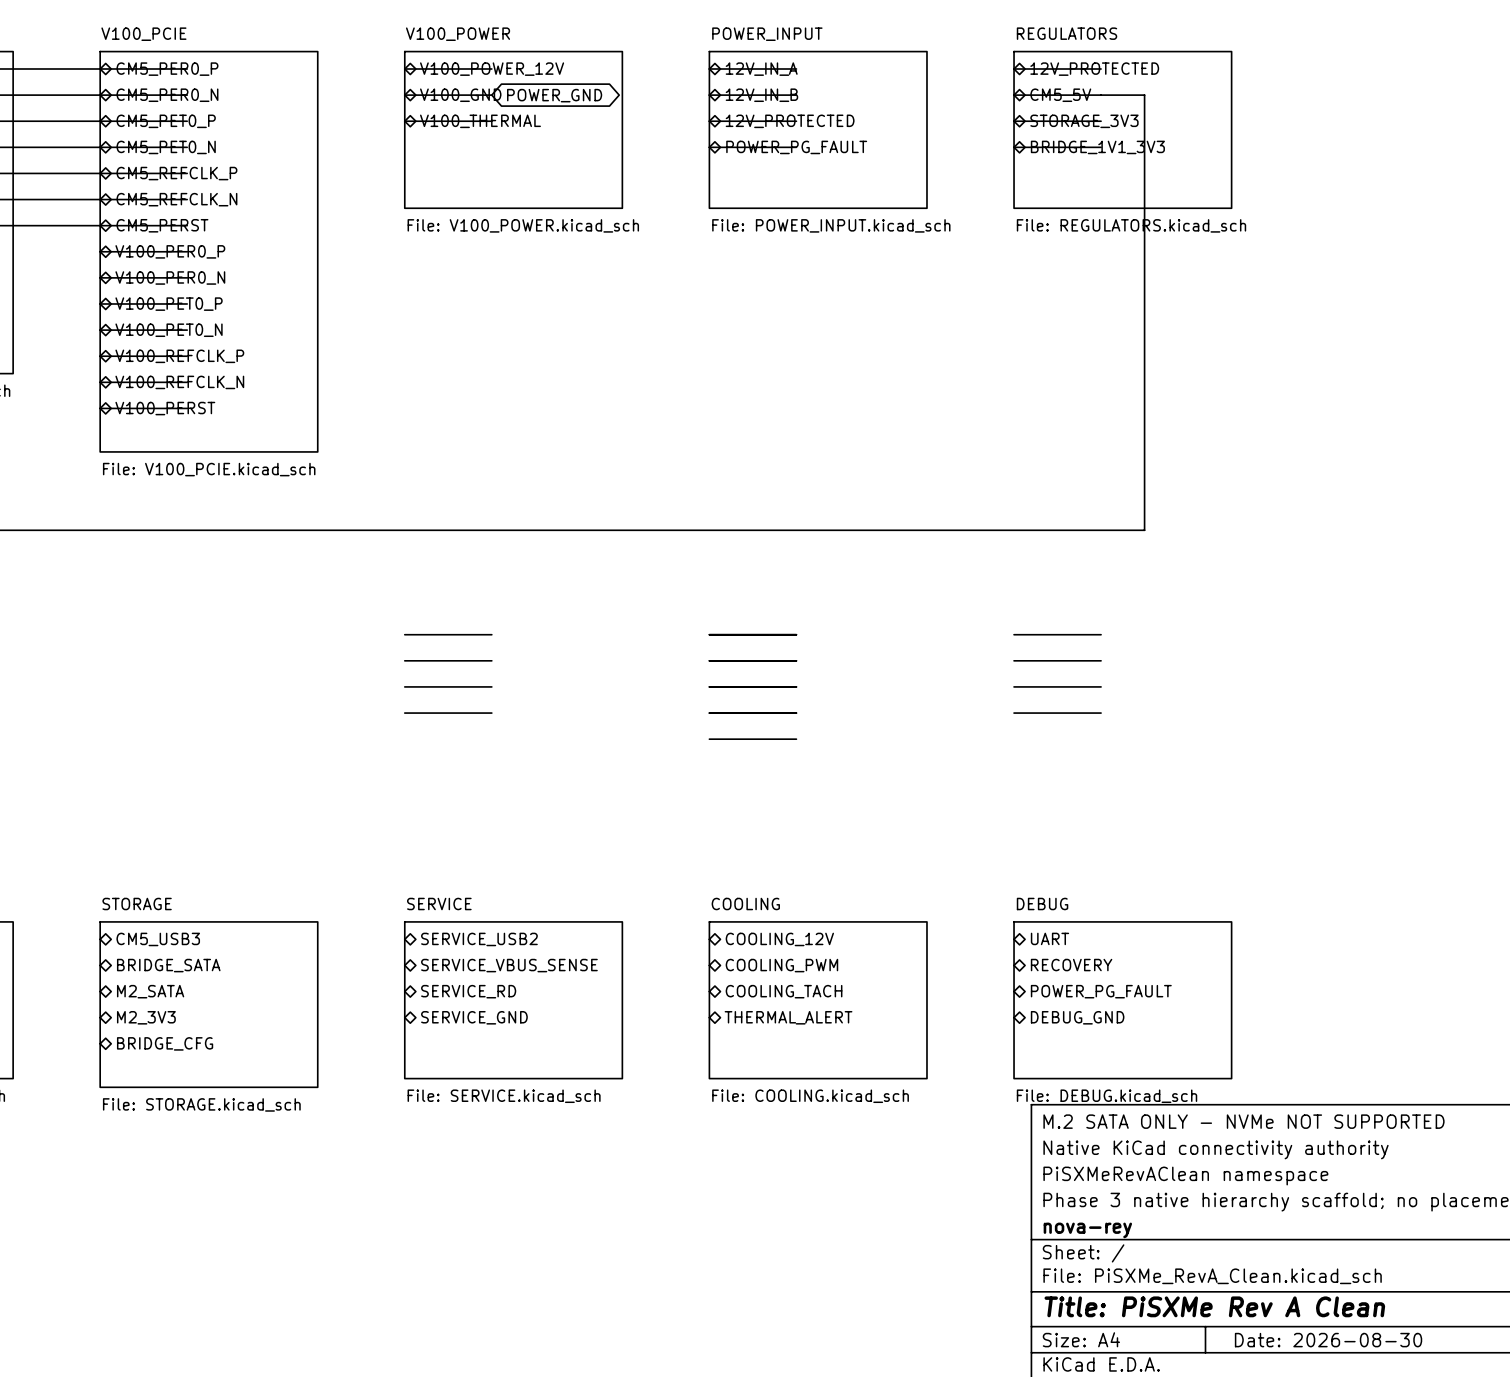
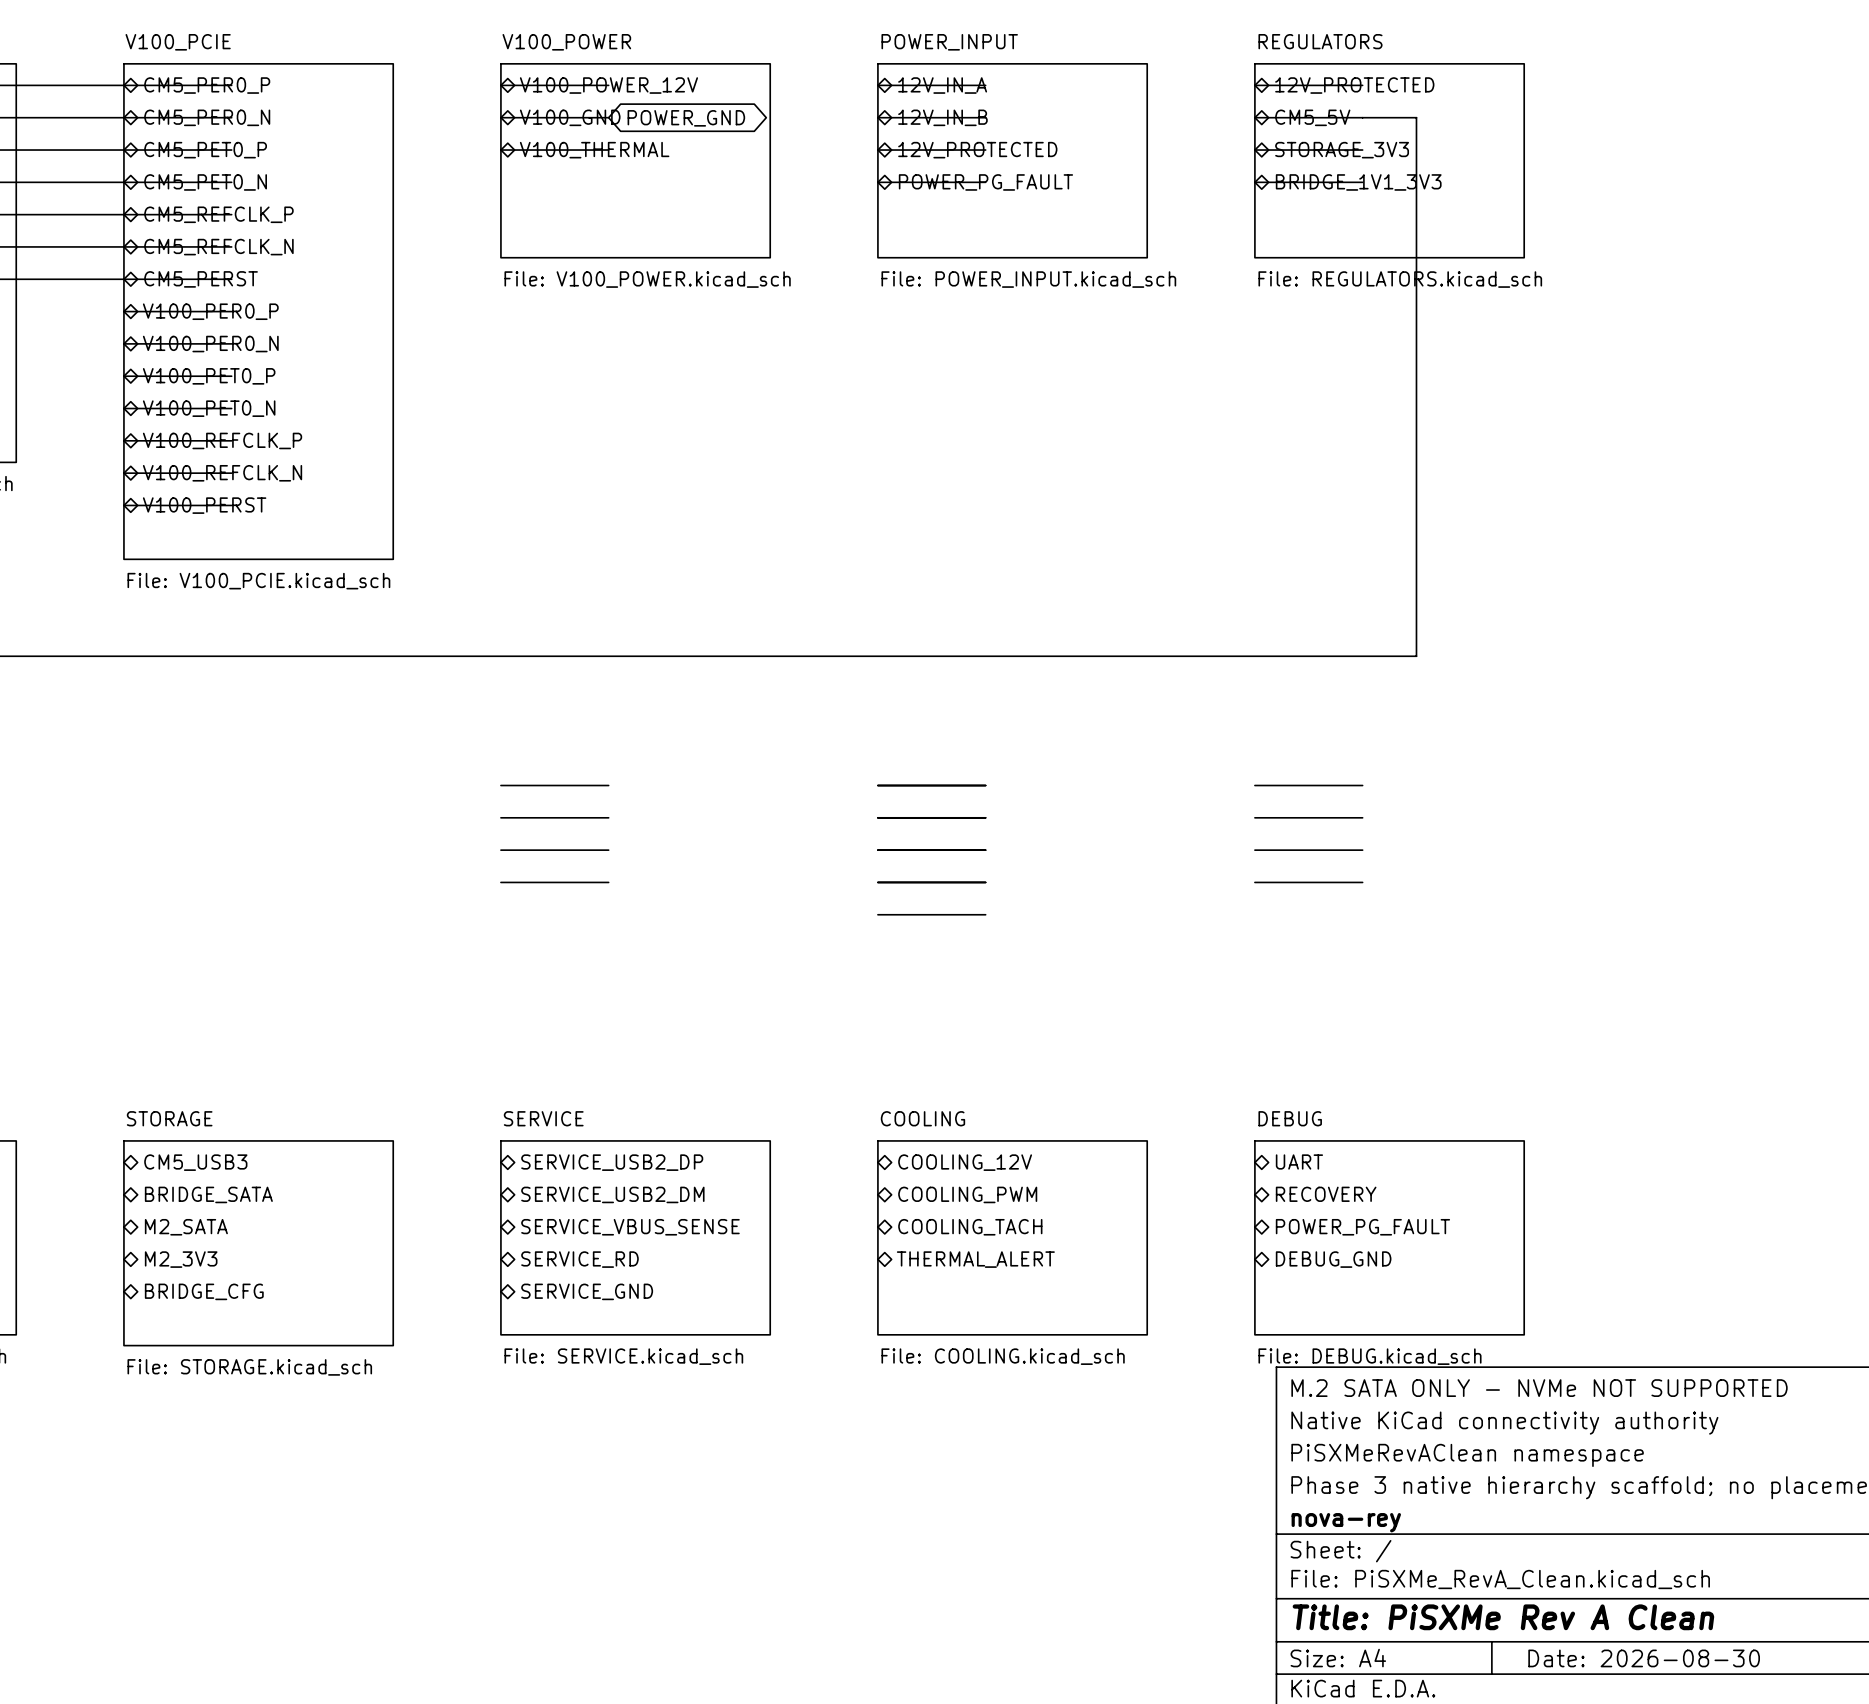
sheet pin: SERVICE_USB2 (479, 939) -> SERVICE_USB2_DP (612, 1162)
sheet pin: SERVICE_VBUS_SENSE (509, 965) -> SERVICE_USB2_DM (612, 1194)
sheet pin: SERVICE_RD (468, 991) -> SERVICE_VBUS_SENSE (630, 1227)
sheet pin: SERVICE_GND (474, 1017) -> SERVICE_RD (579, 1259)
sheet pin: none -> SERVICE_GND (587, 1291)

